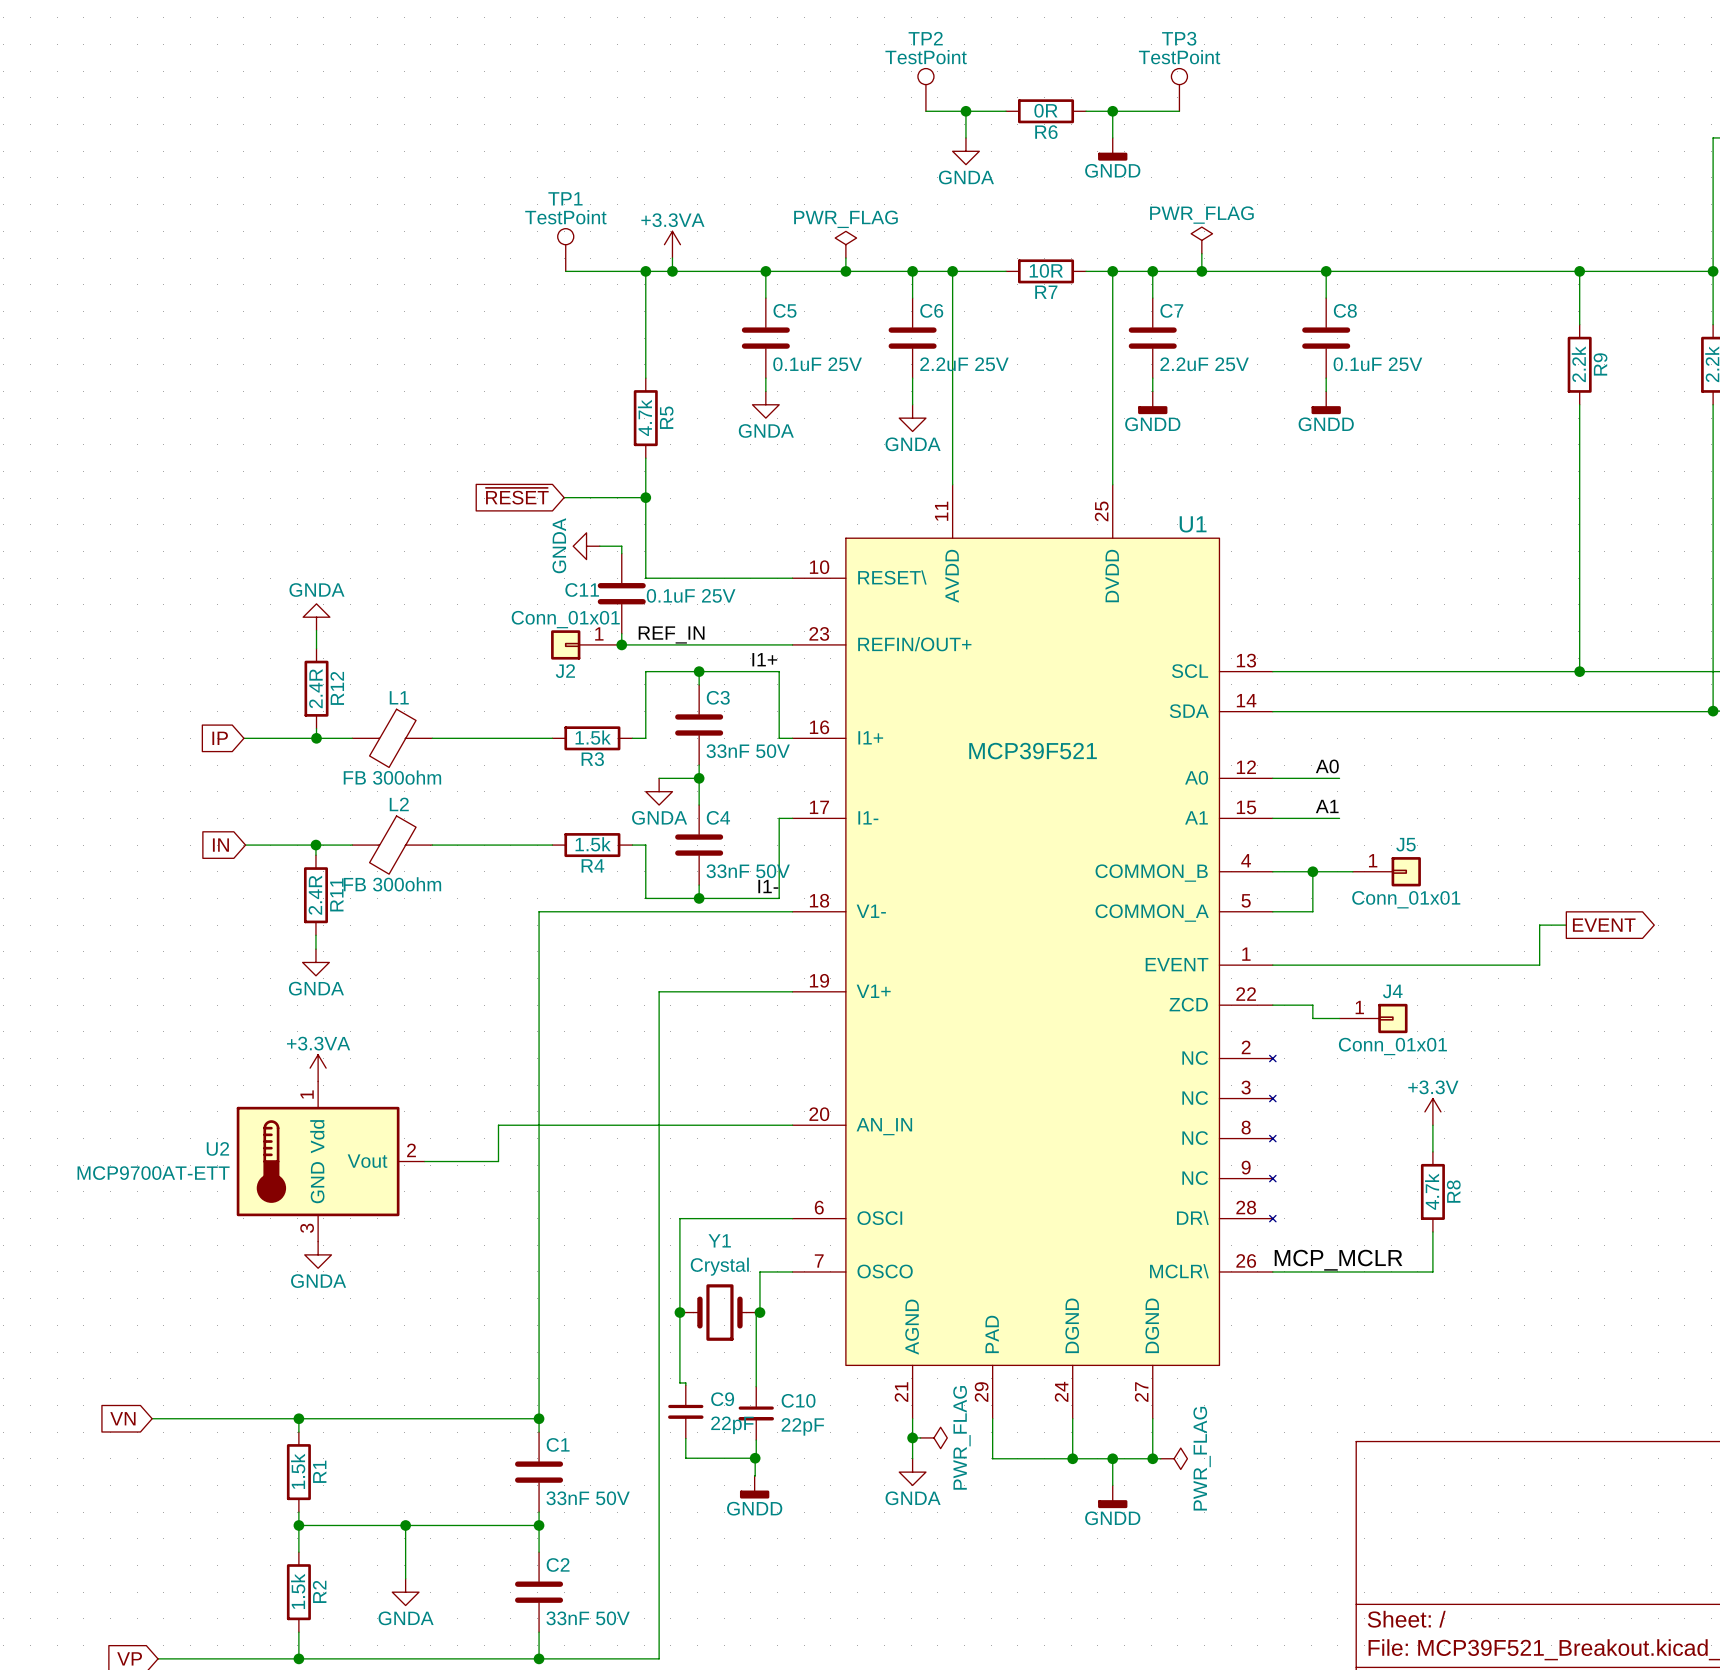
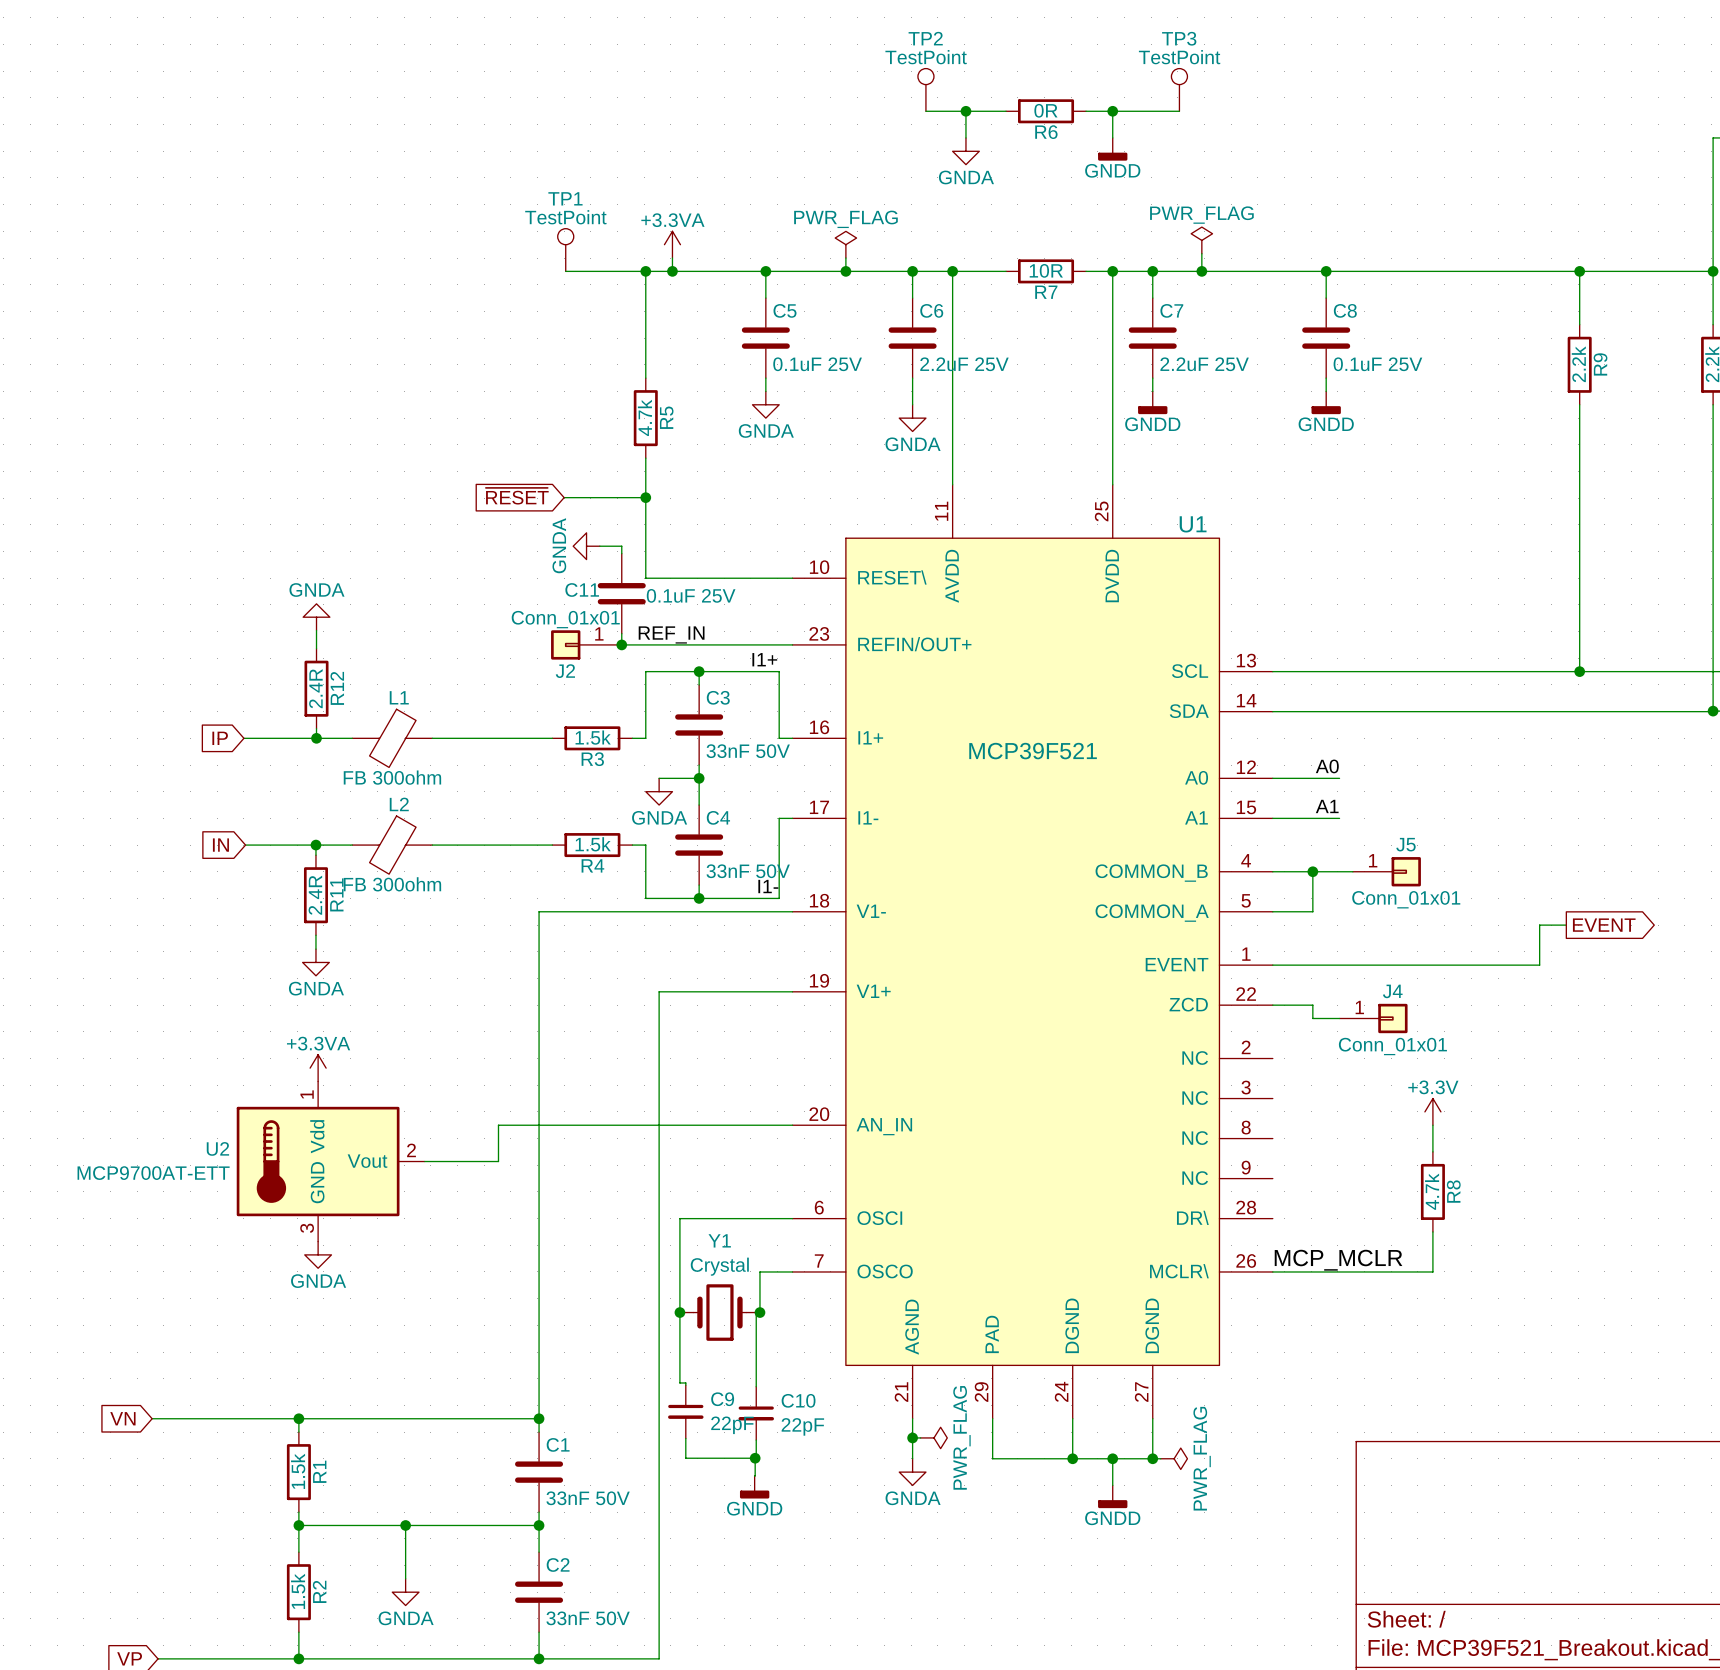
U1 symbol: [792, 484, 1276, 1419] -> [792, 484, 1273, 1419]

